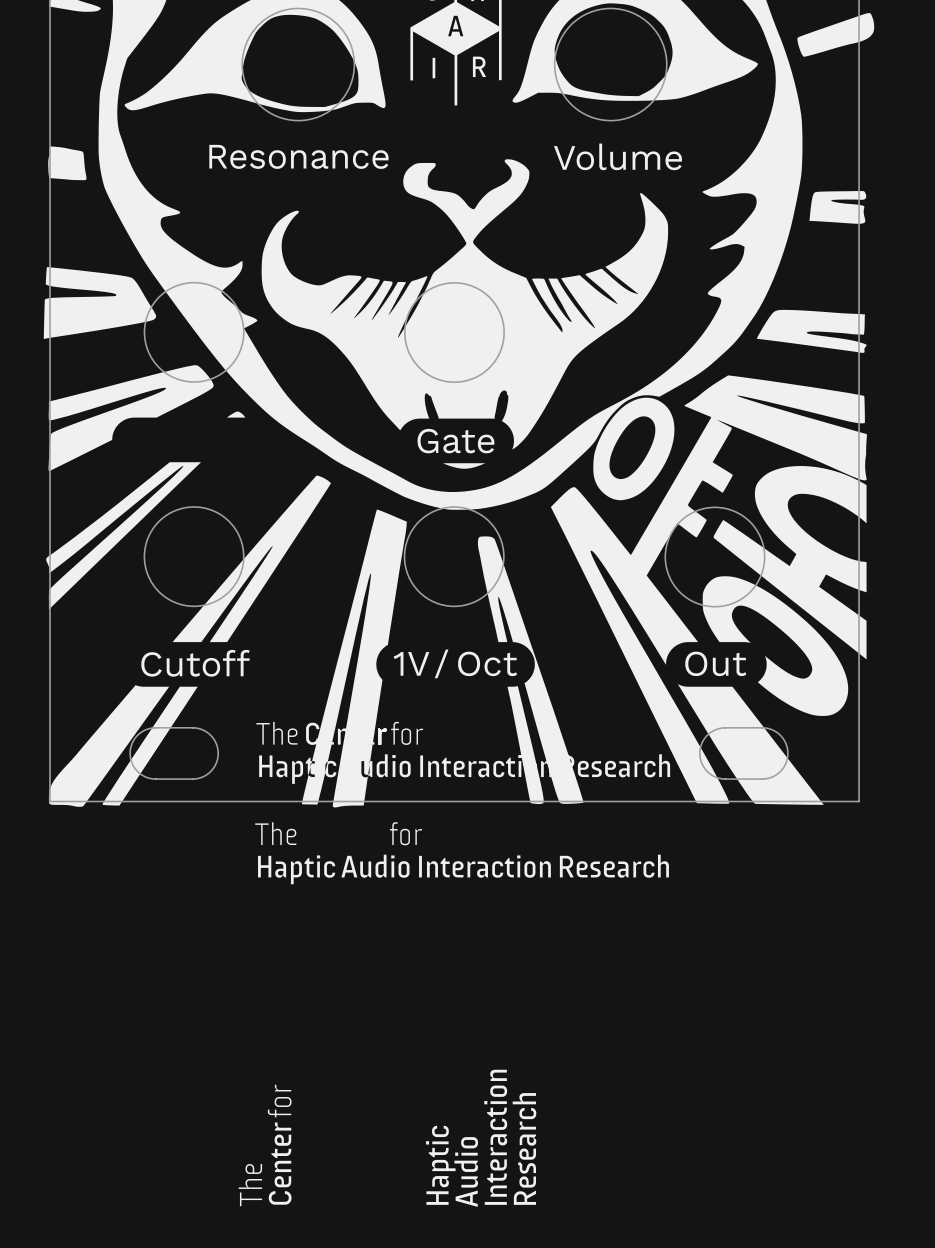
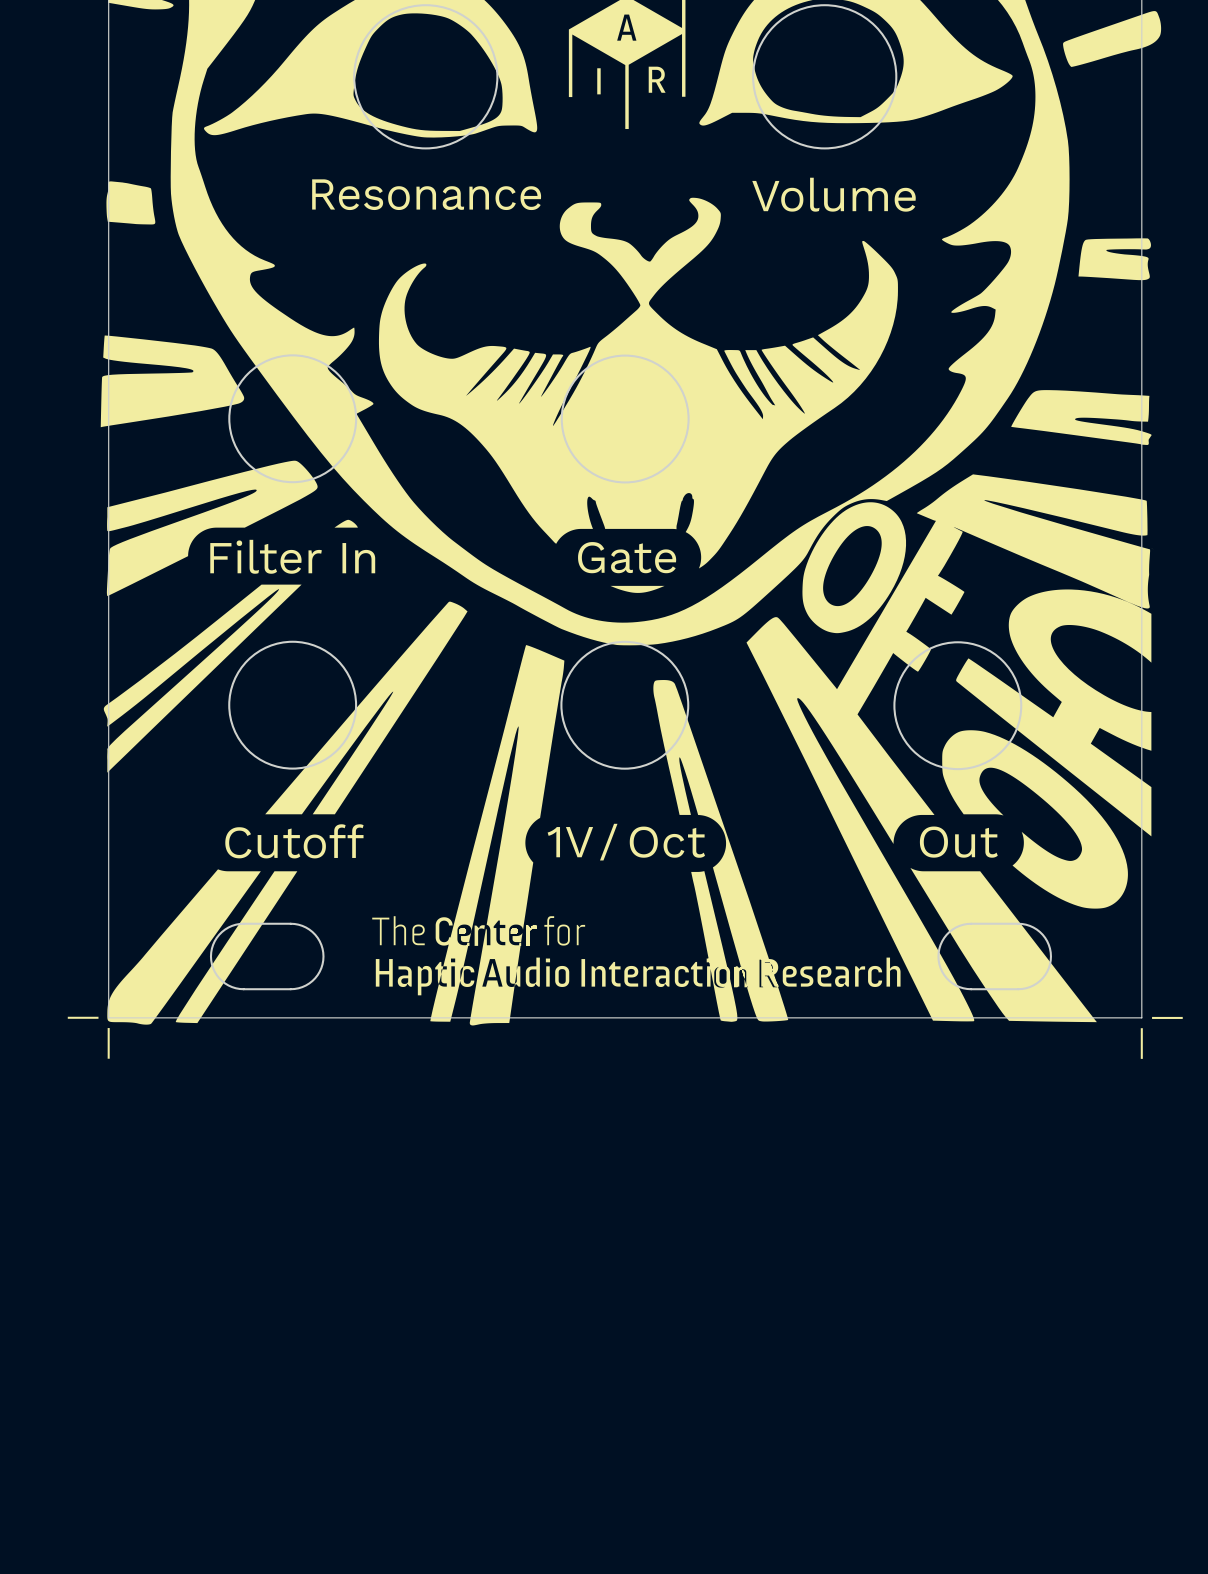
drawing shape: [550, 375, 867, 804] -> [746, 474, 1151, 1022]
drawing: none -> [210, 539, 376, 574]
drawing shape: [477, 536, 584, 804] -> [653, 680, 789, 1022]
drawing shape: [507, 686, 544, 805] -> [691, 871, 738, 1022]
drawing: [318, 725, 387, 778] -> none
drawing: none -> [459, 925, 537, 946]
drawing: none -> [734, 959, 777, 988]
drawing: none -> [67, 1016, 110, 1059]
drawing: none -> [1140, 1016, 1183, 1059]
drawing: [255, 822, 669, 885] -> none
drawing: [238, 1069, 537, 1207] -> none

